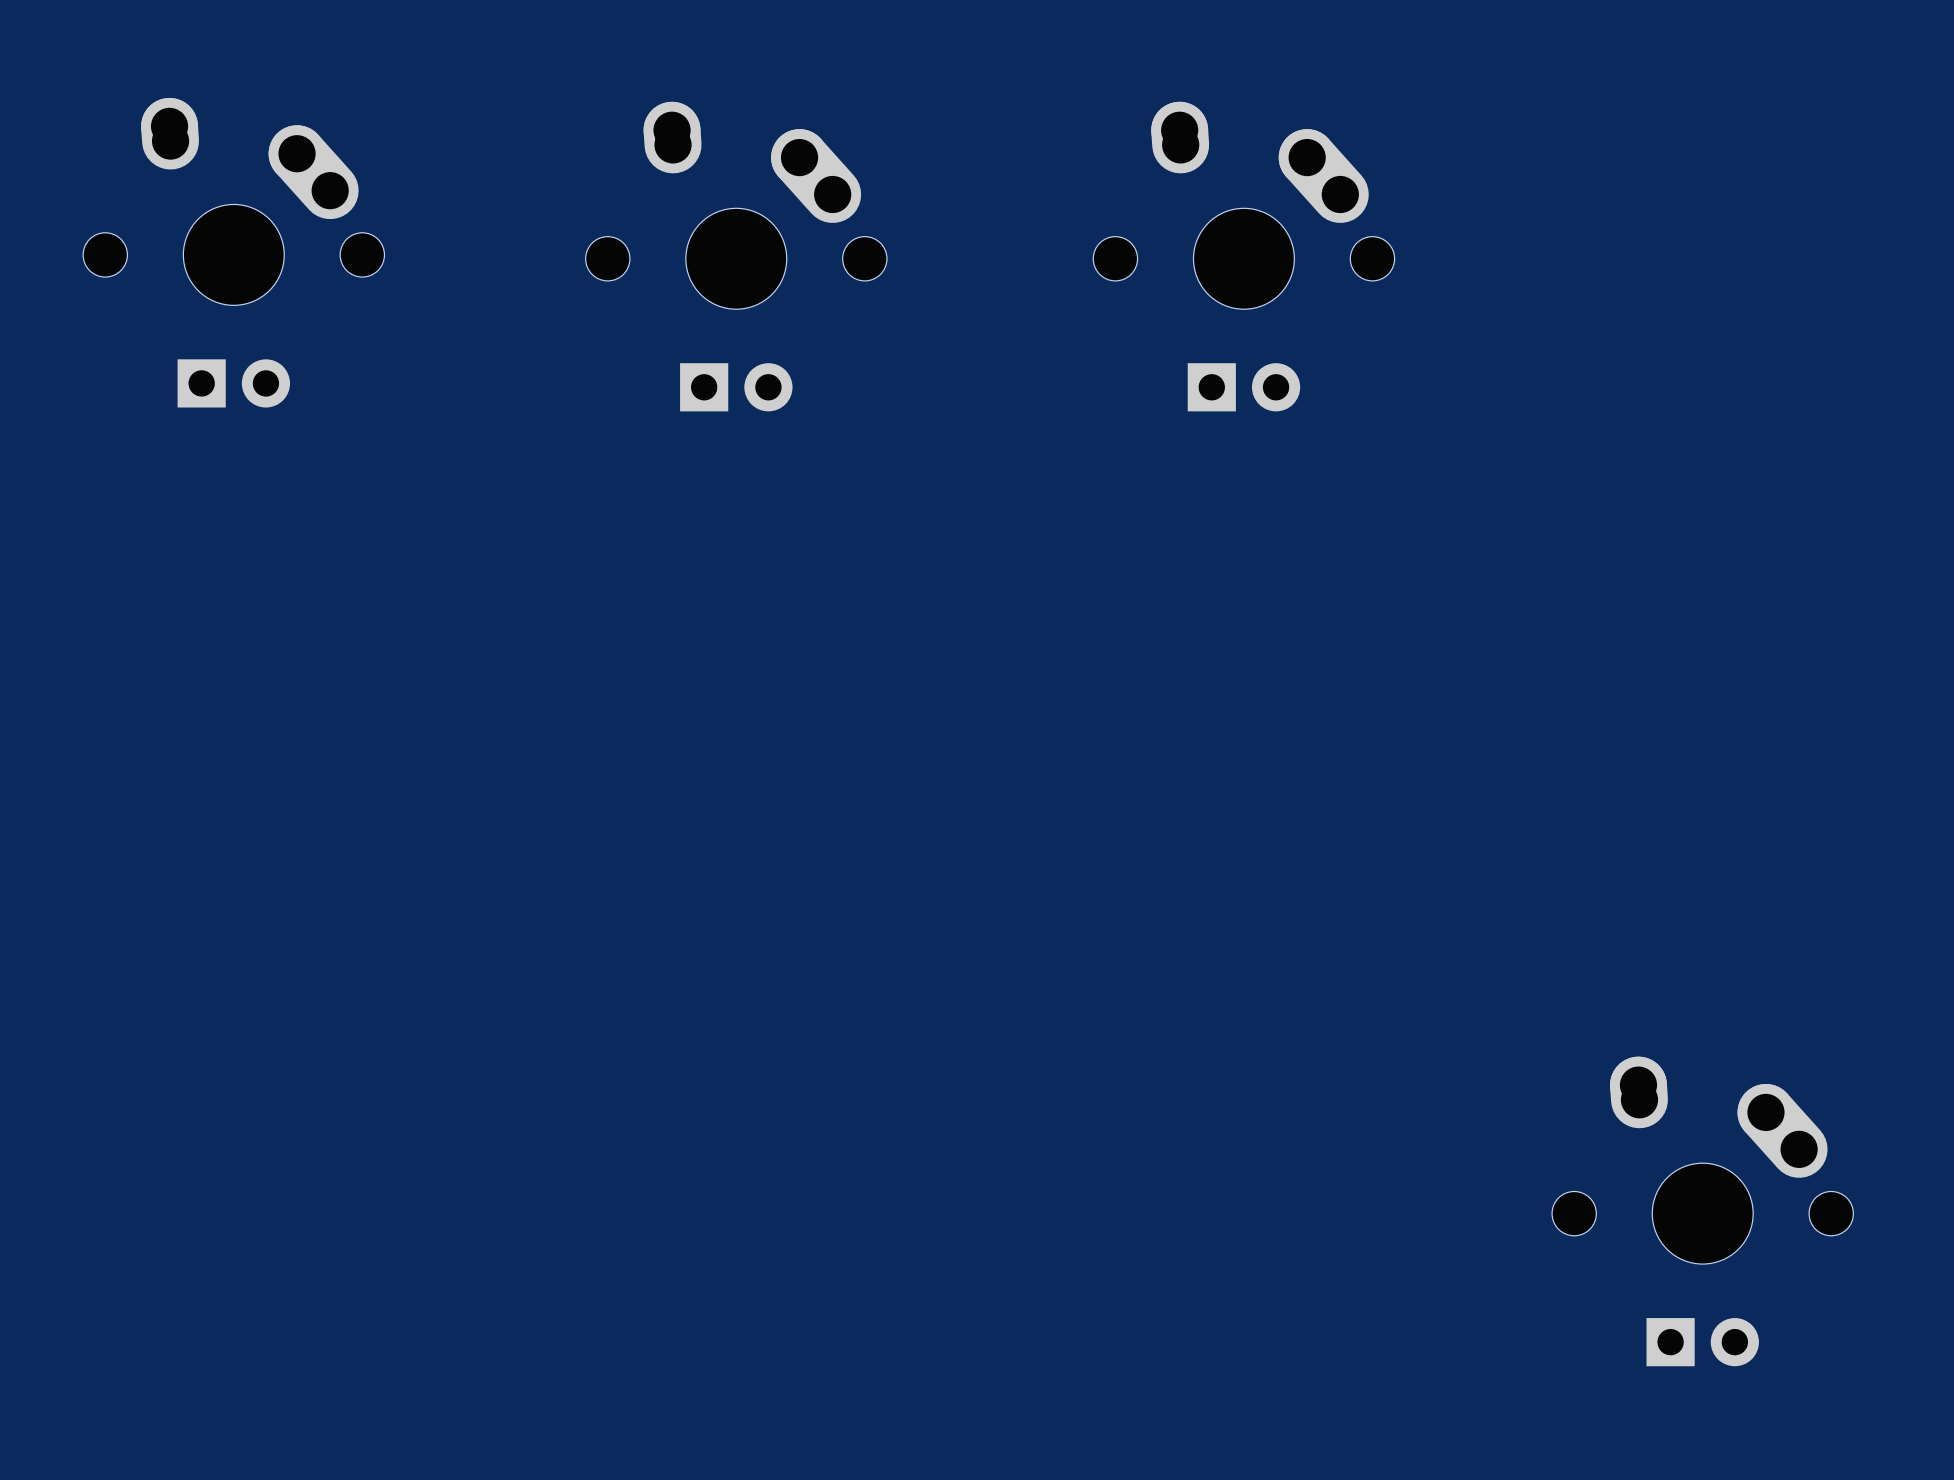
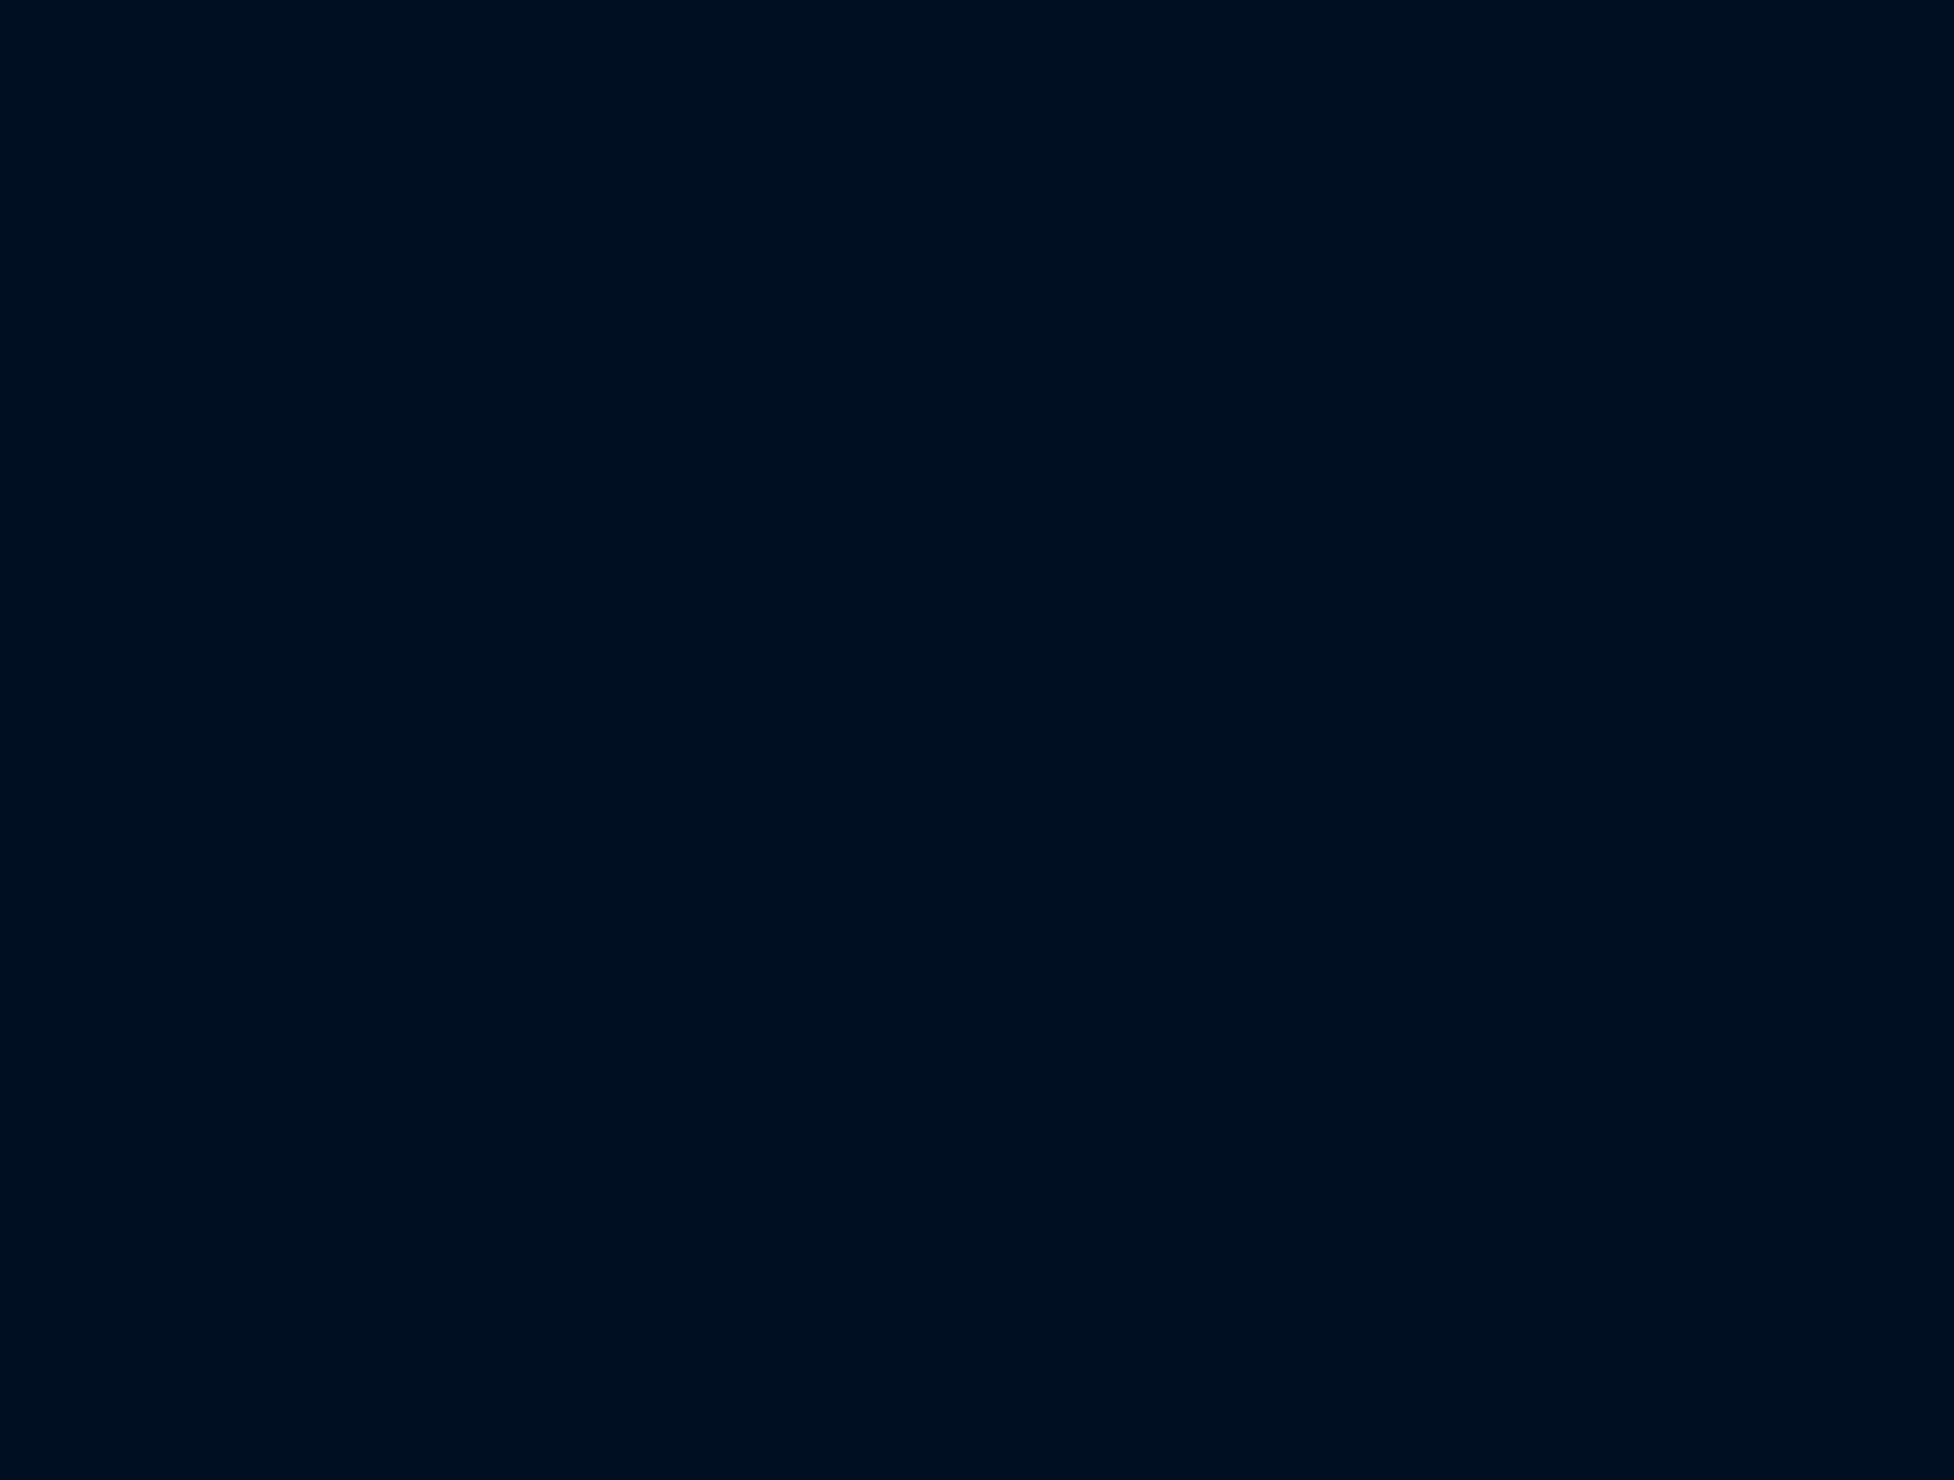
part: (233, 252) -> none
part: (736, 256) -> none
part: (1243, 256) -> none
part: (1702, 1211) -> none

